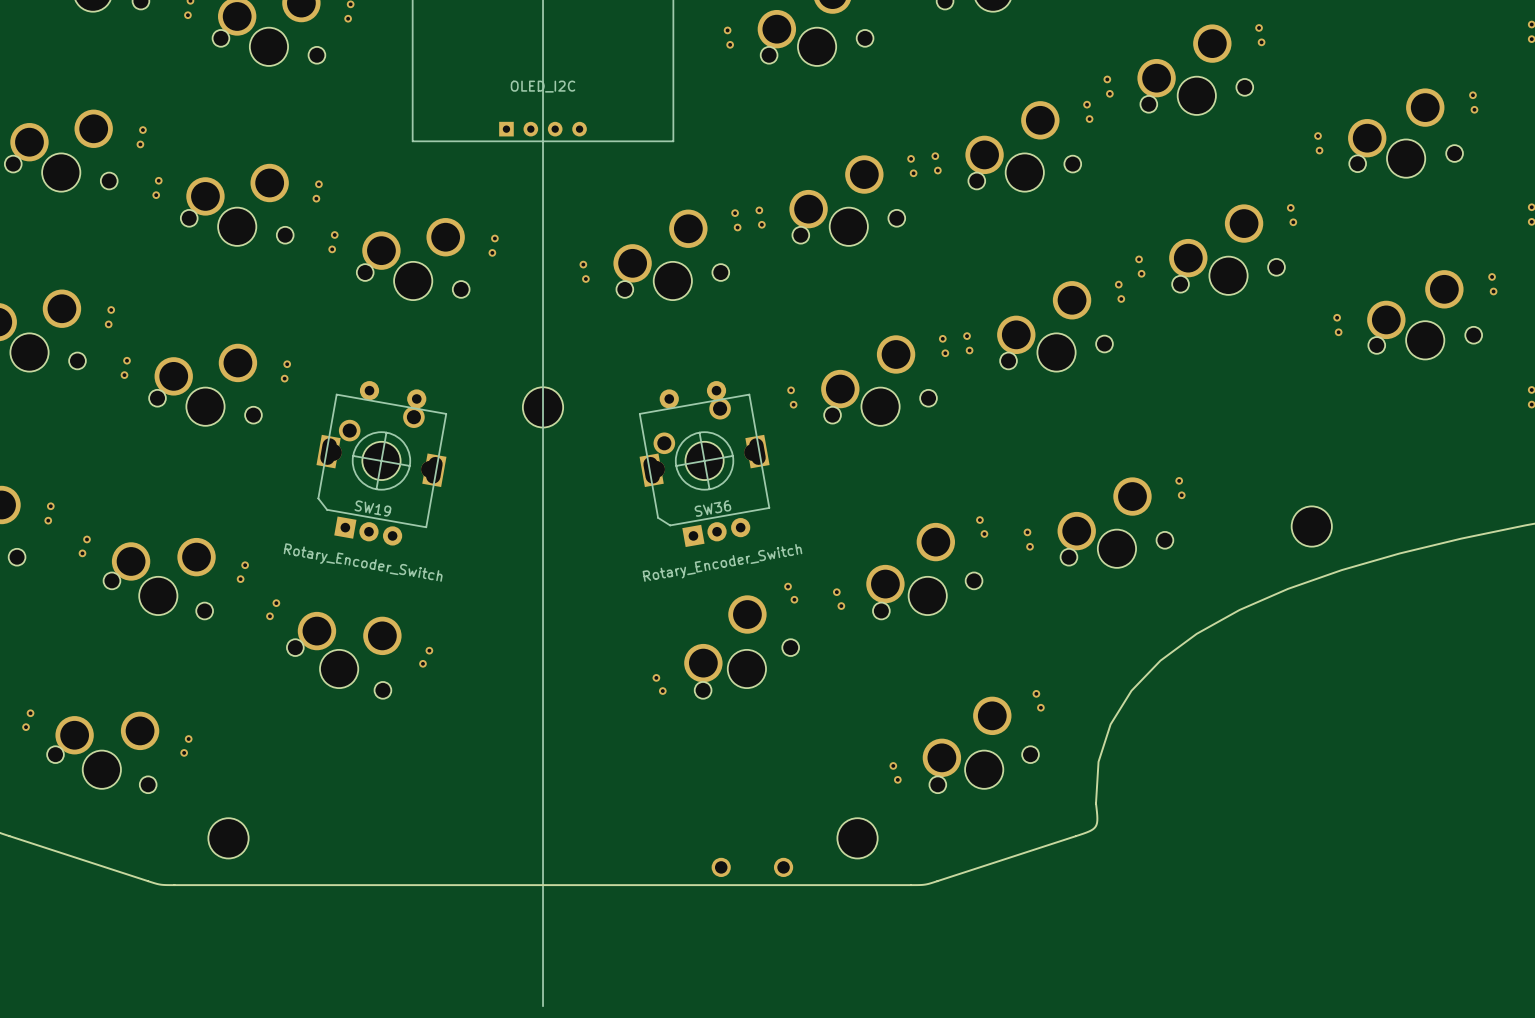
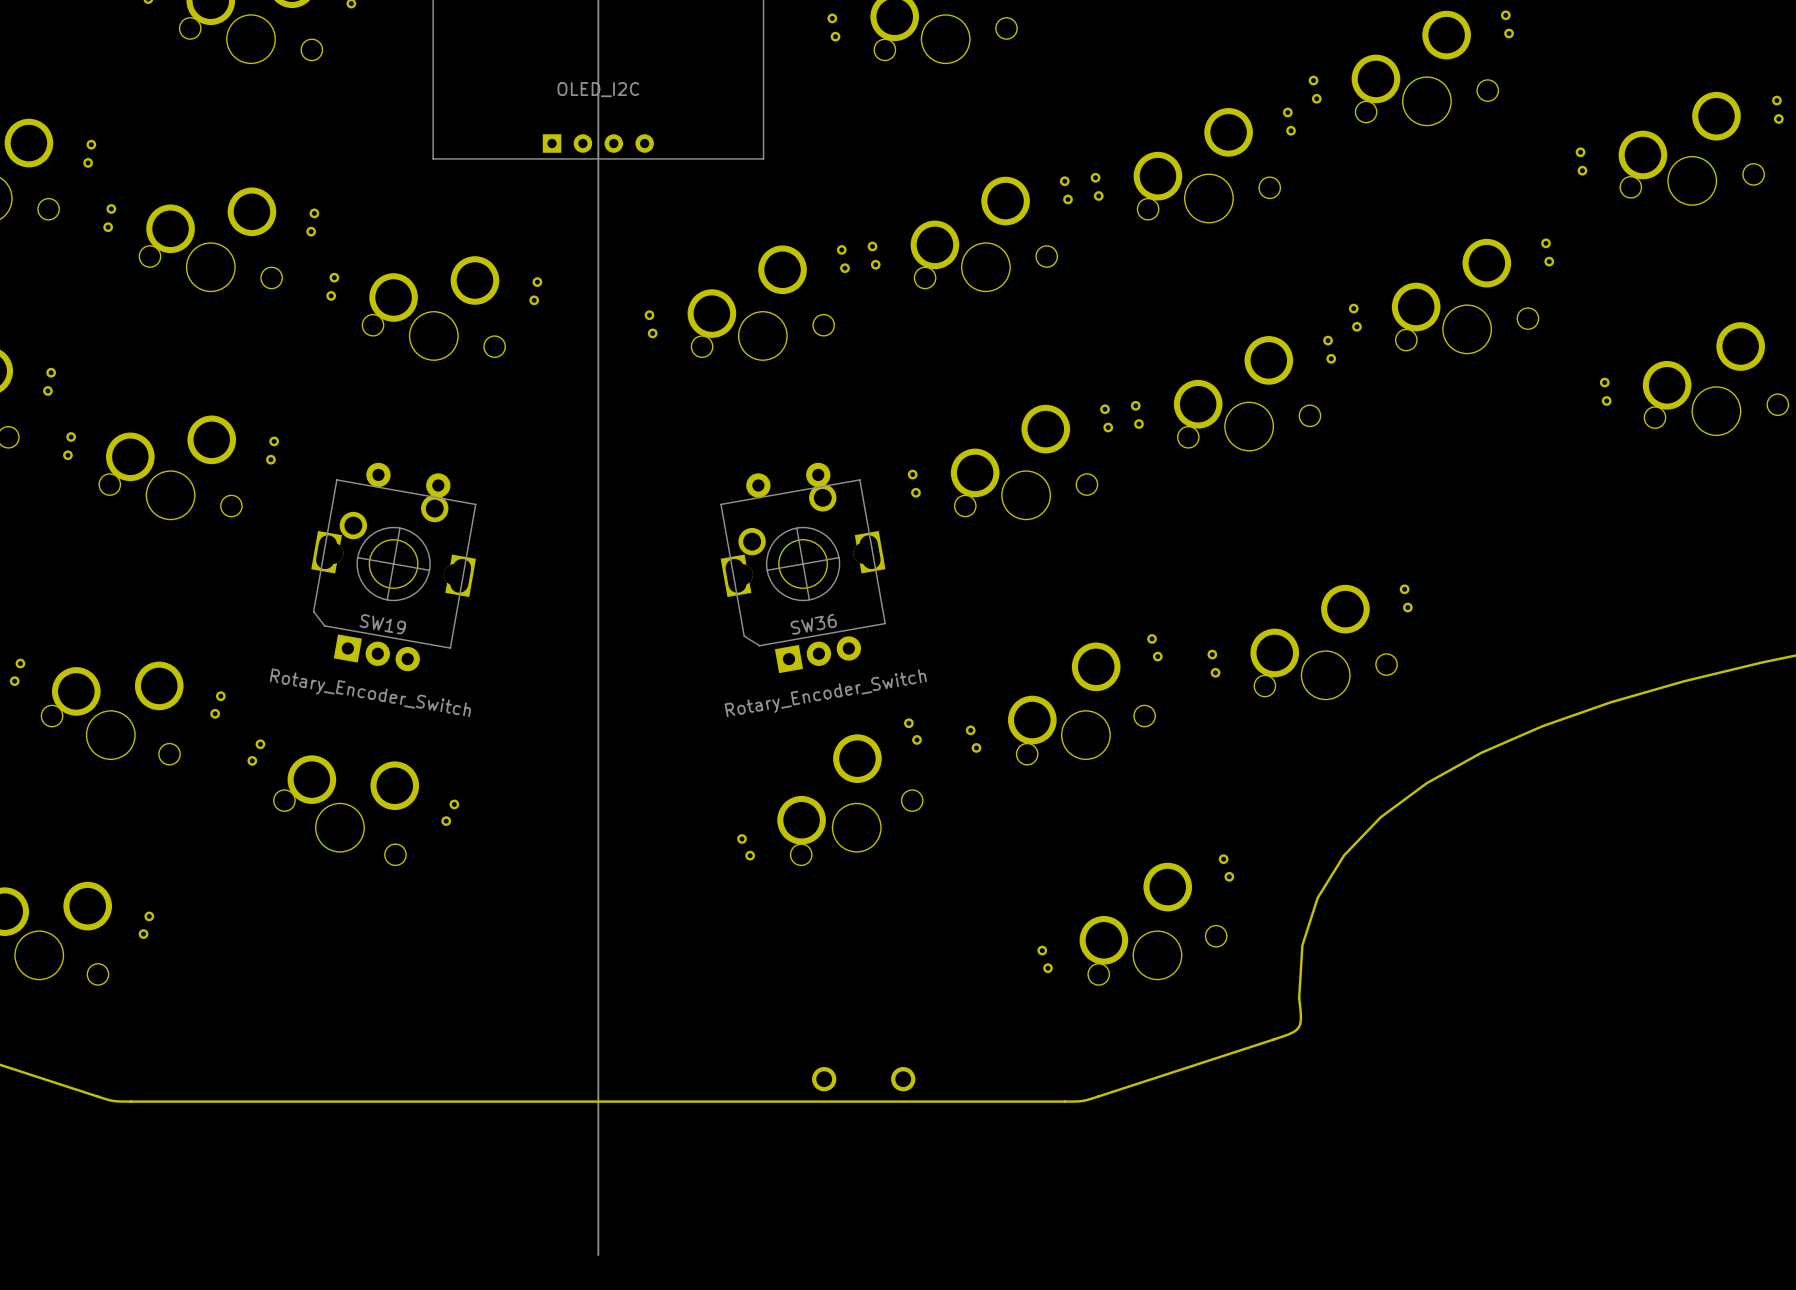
part: (543, 407) -> none
part: (1311, 526) -> none
part: (228, 838) -> none
part: (857, 838) -> none

